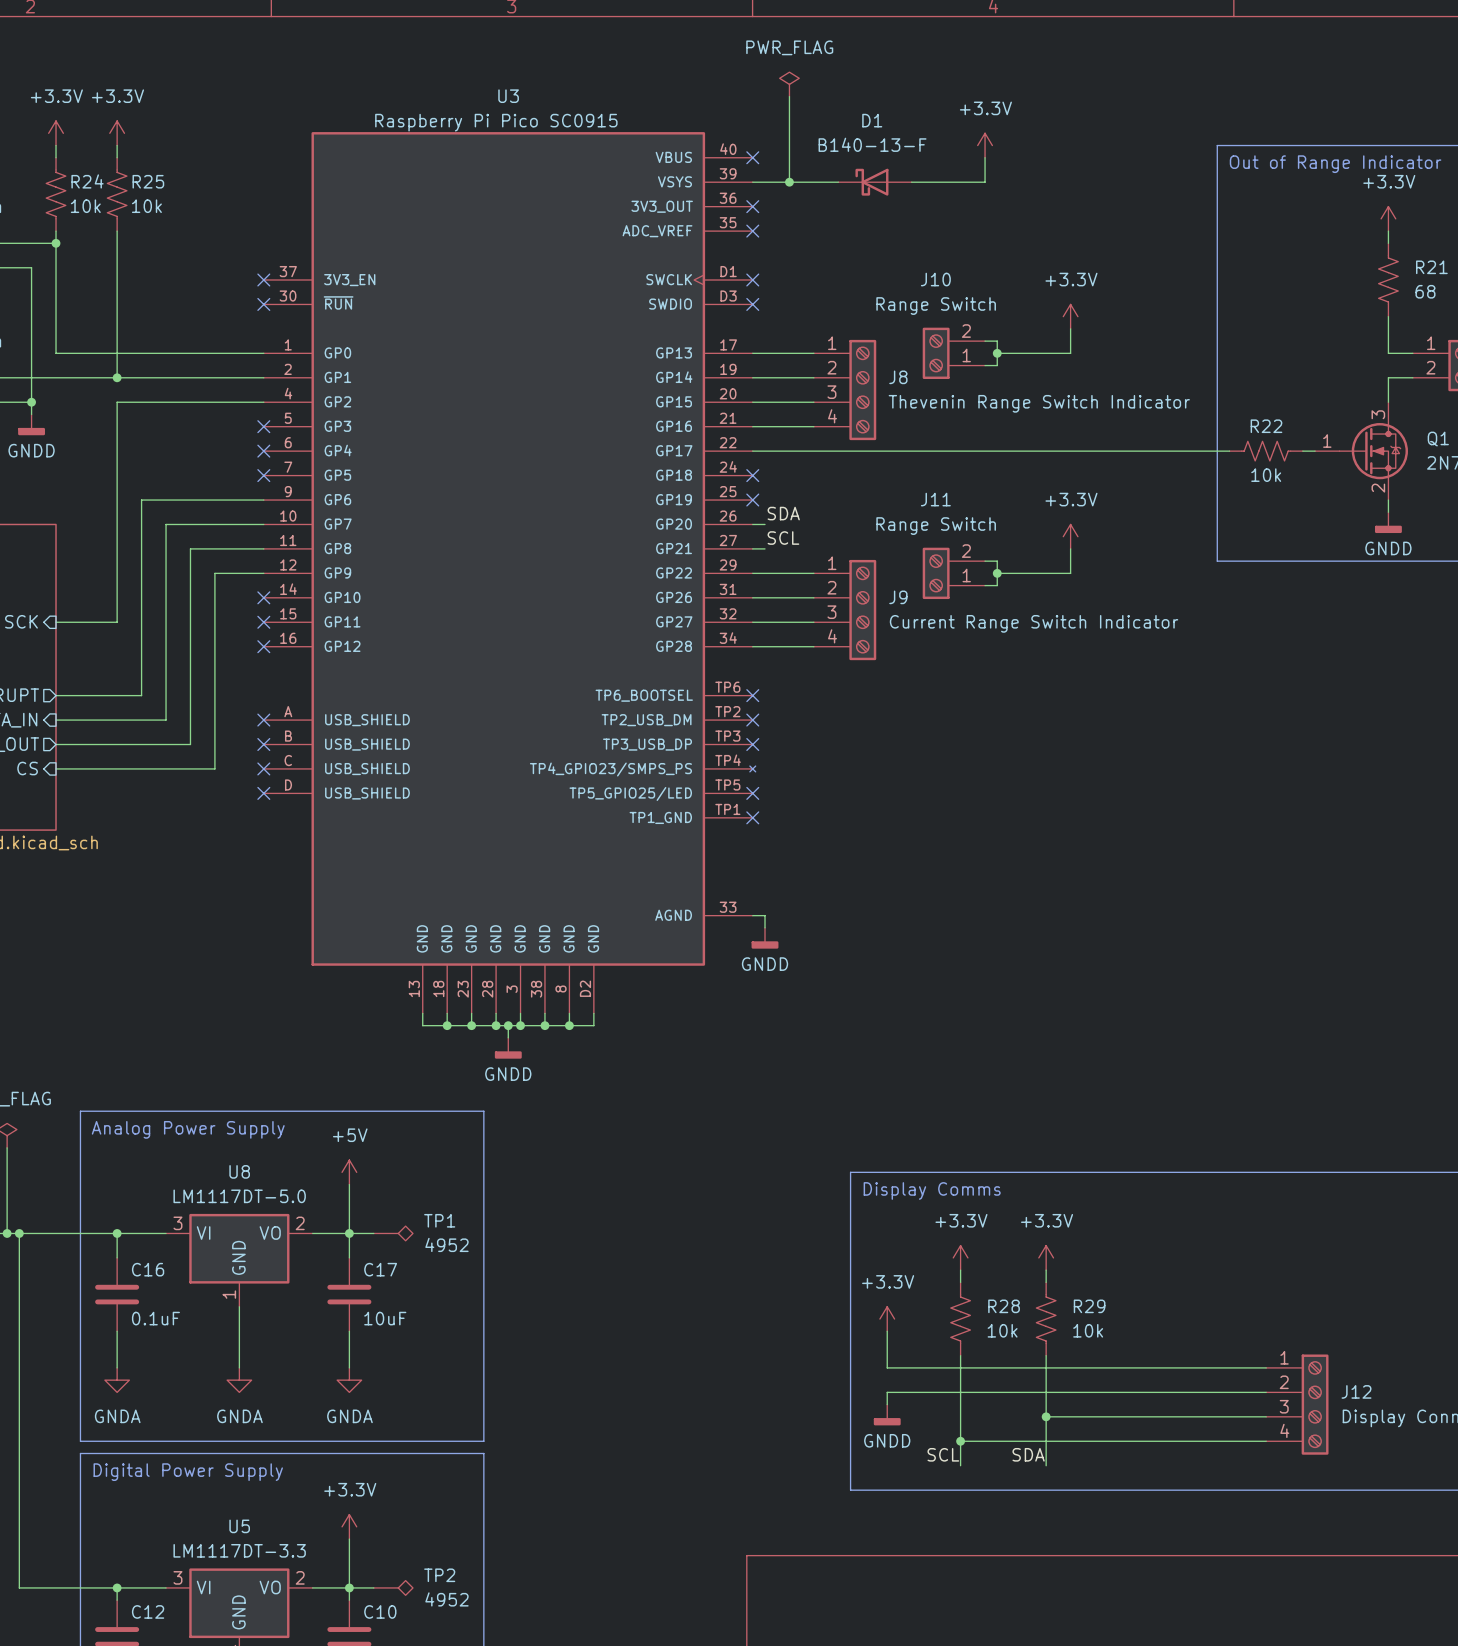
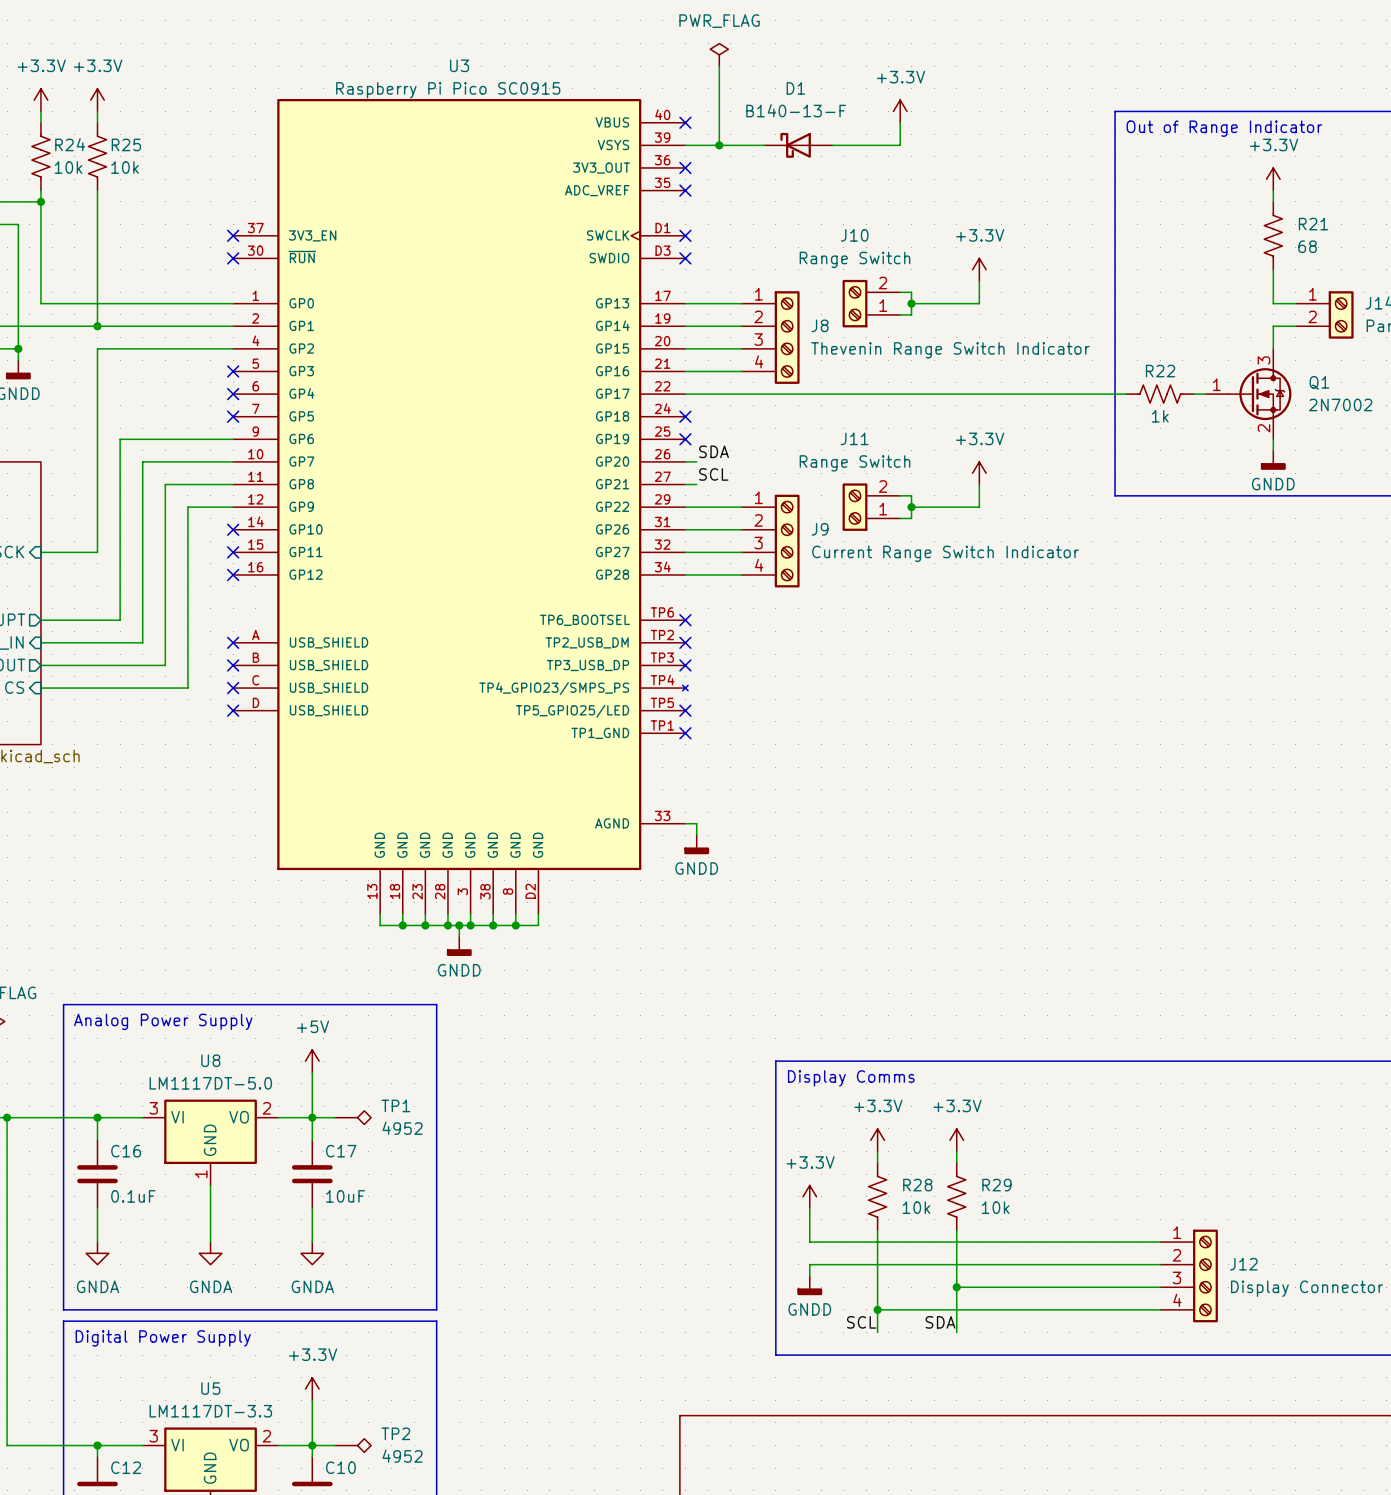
R22 value: 10k (1266, 475) -> 1k (1160, 416)

